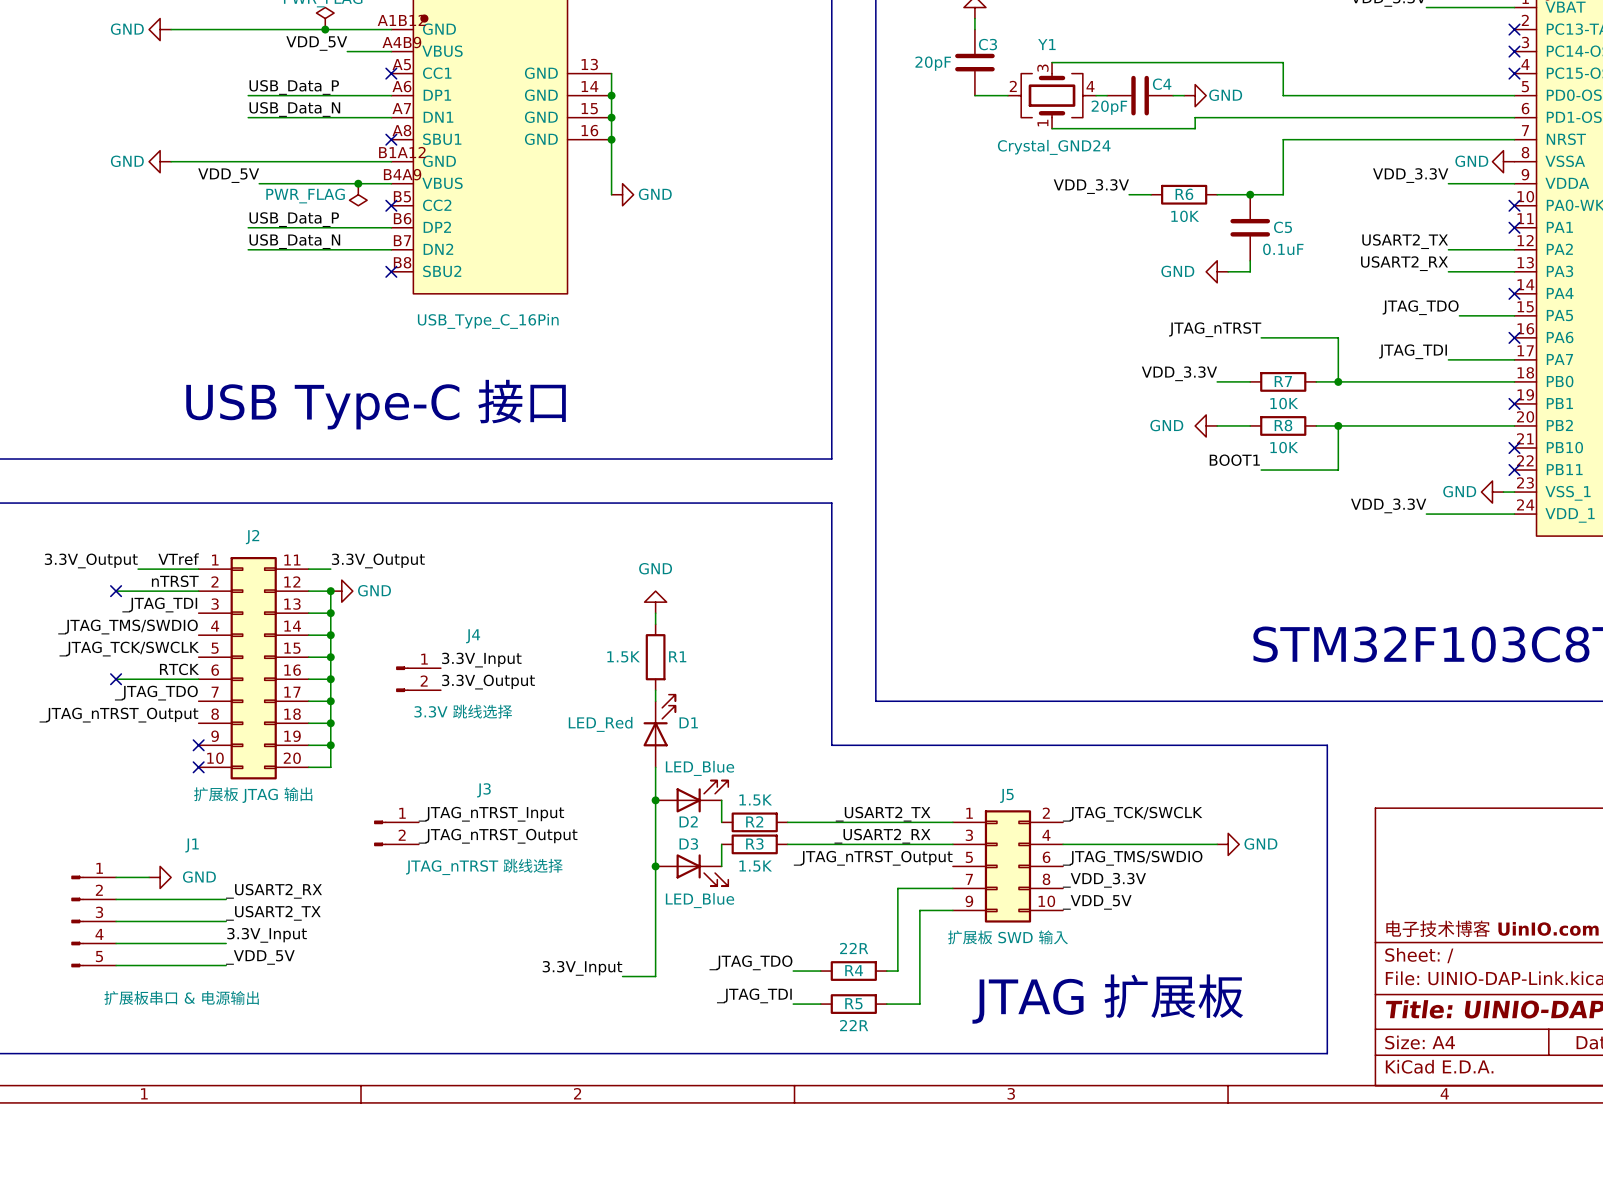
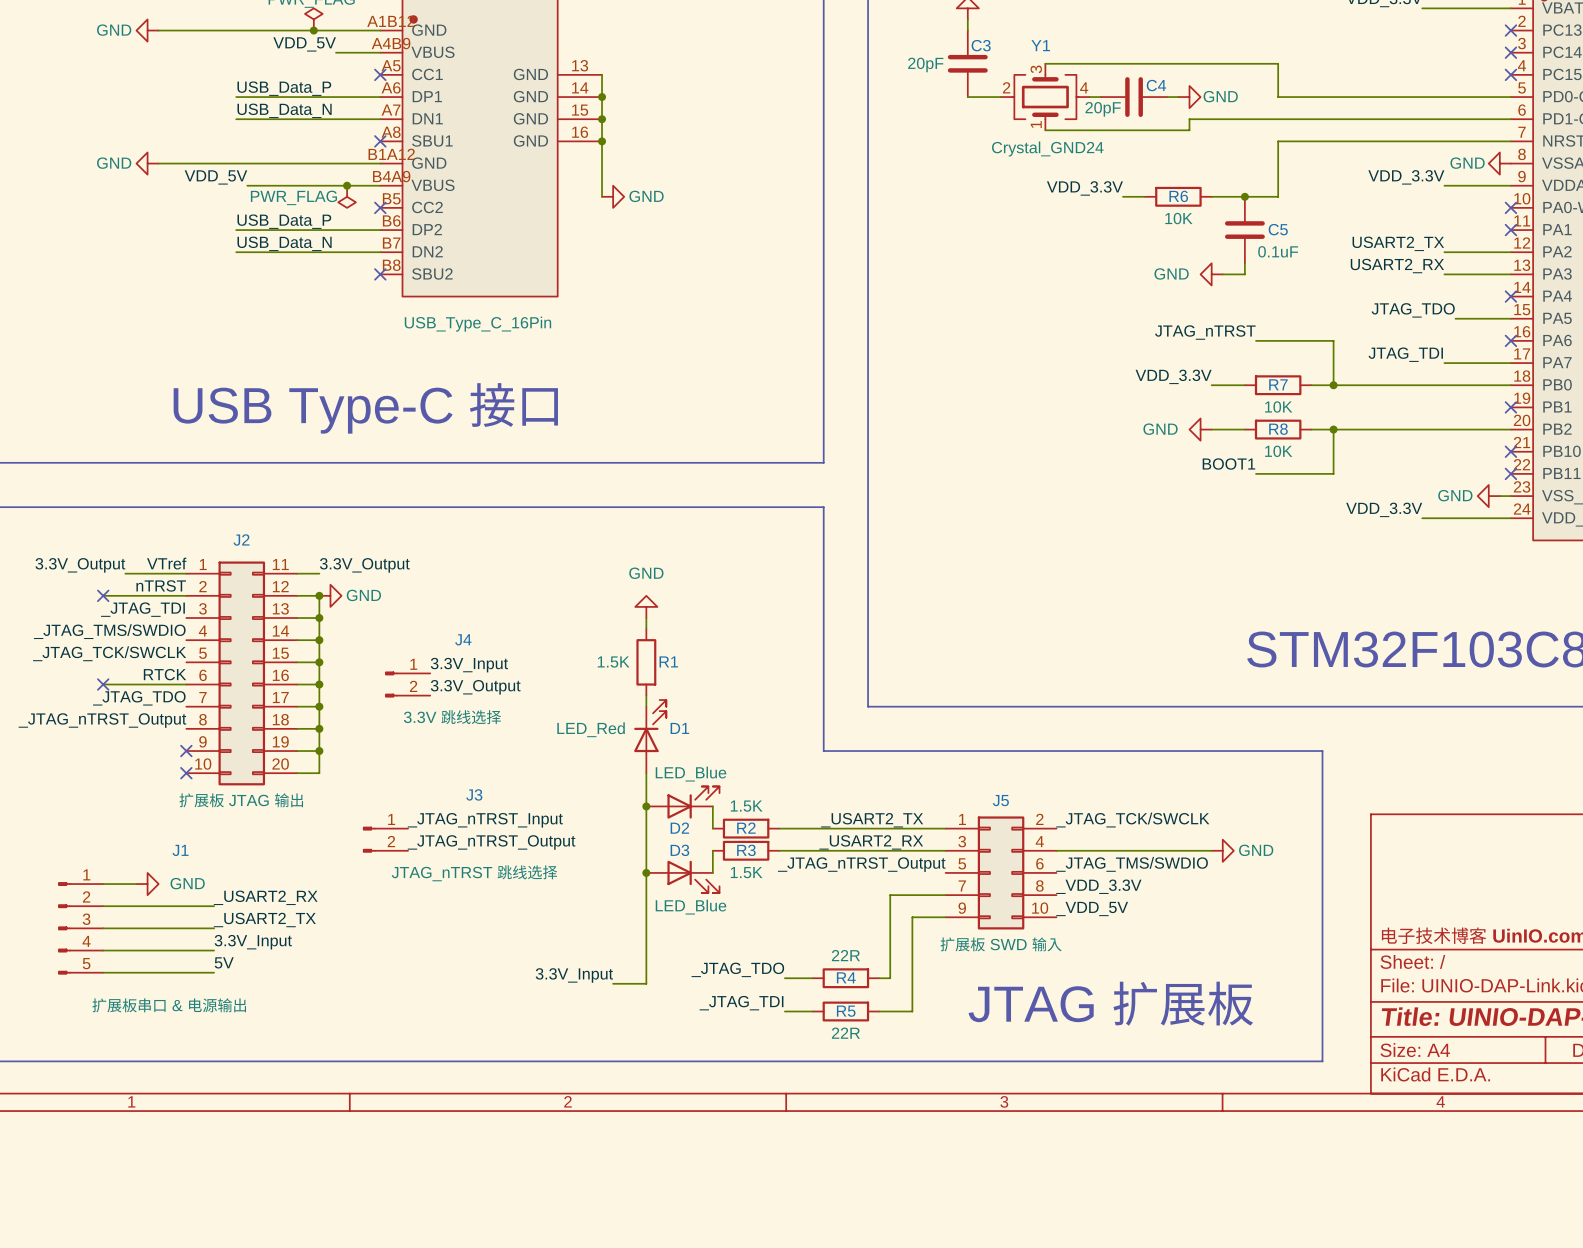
label: _VDD_5V (260, 957) -> 5V (224, 962)

